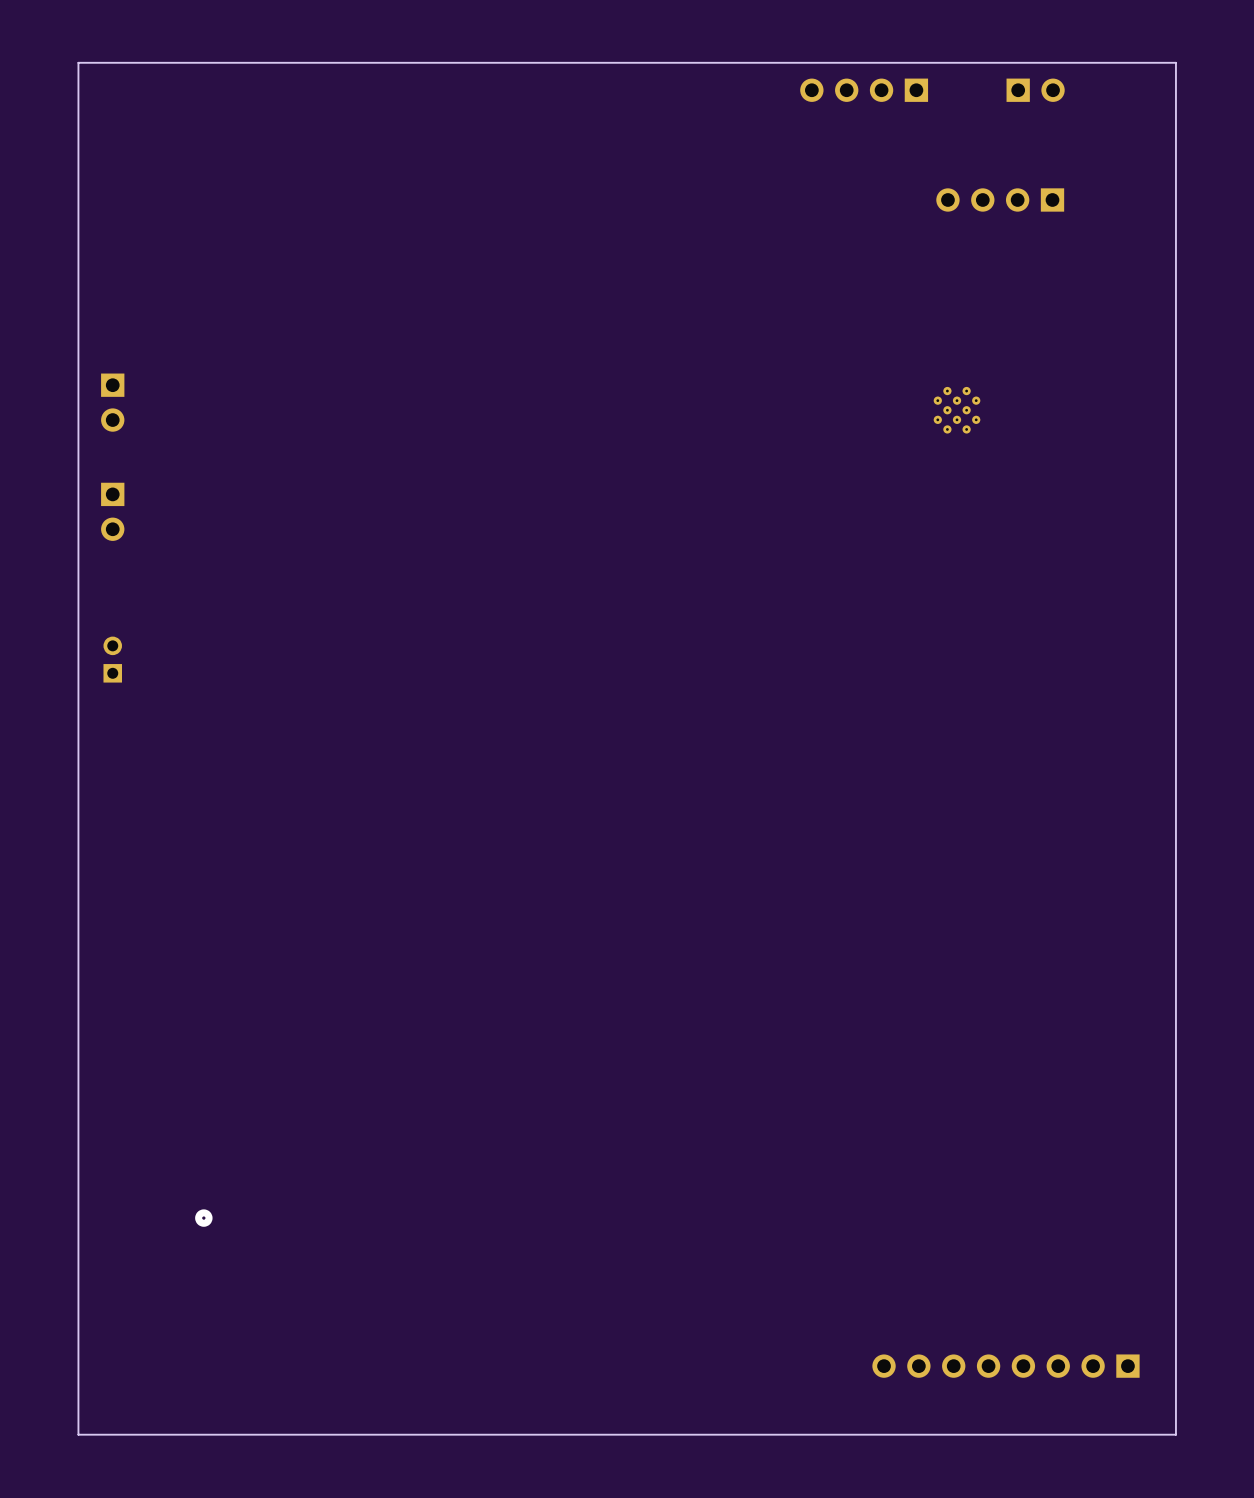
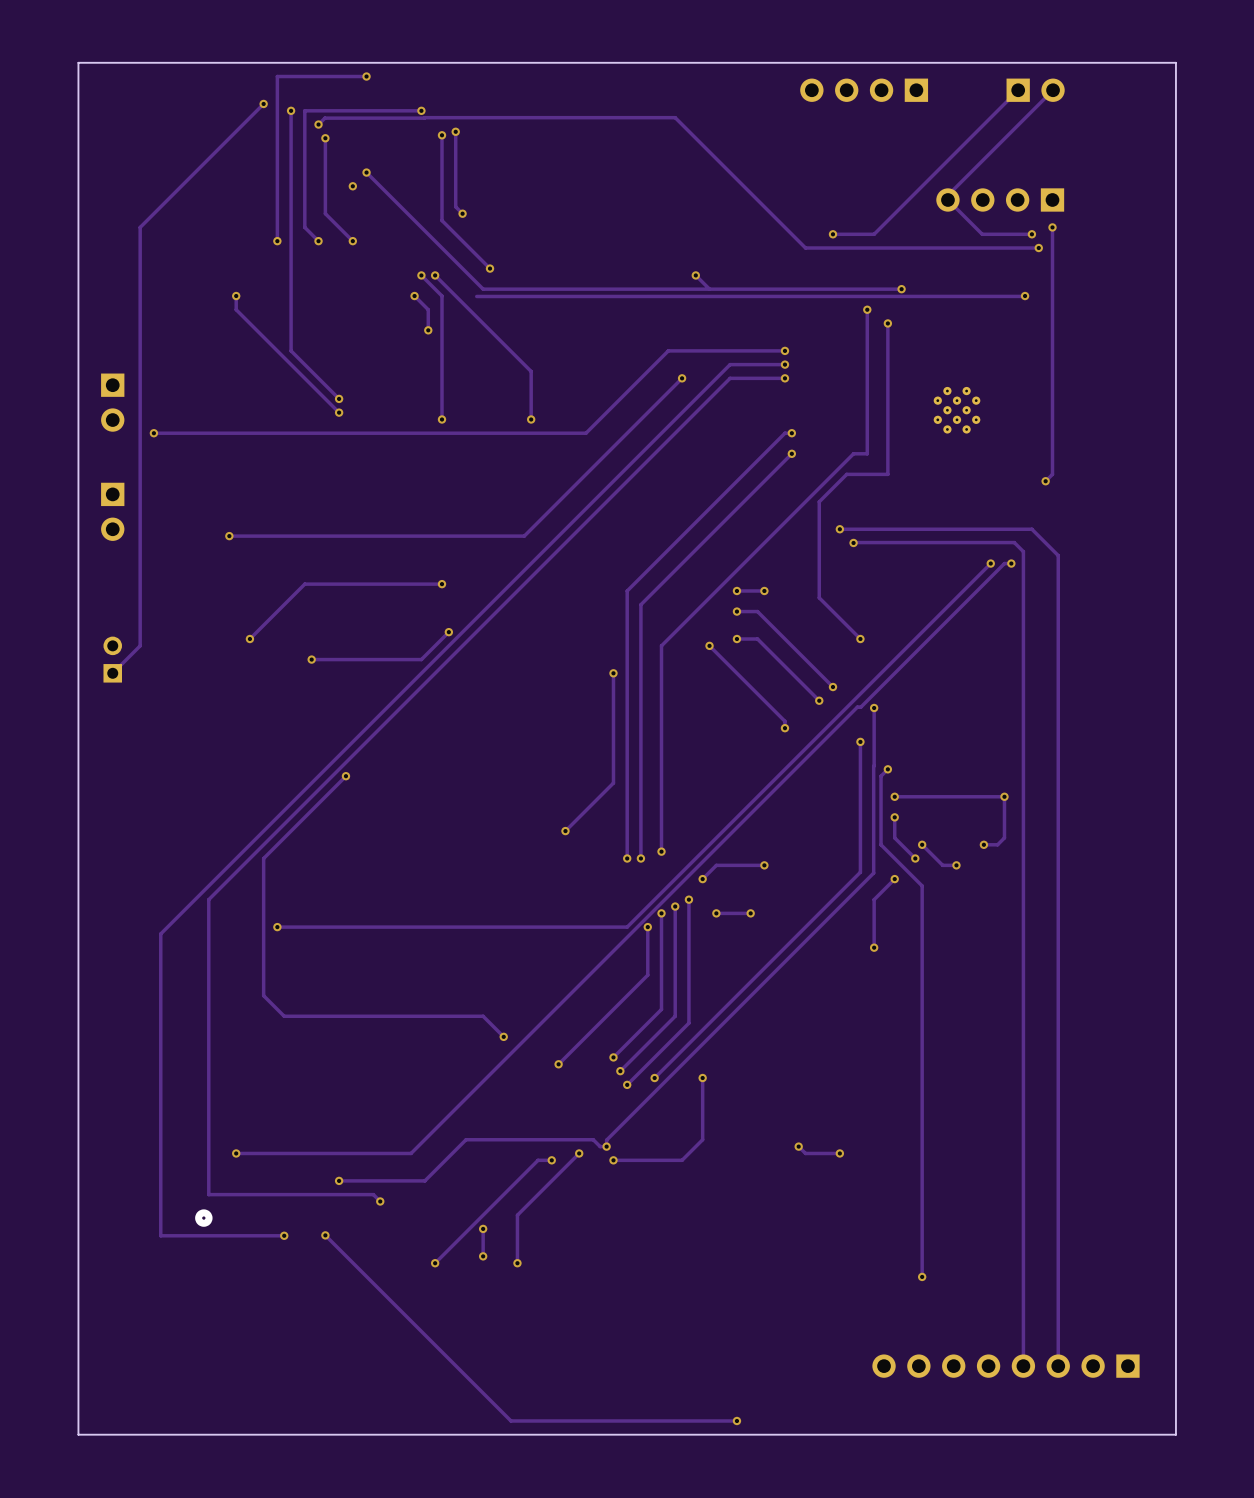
track: none -> (366, 76) (277, 76) (277, 241)
via: none -> (366, 76)
track: none -> (1018, 90) (874, 234) (832, 234)
track: none -> (1053, 94) (1053, 90) (947, 195) (947, 199) (982, 234) (1031, 234)
track: none -> (263, 103) (140, 227) (140, 645) (112, 673)
via: none -> (263, 103)
track: none -> (291, 110) (291, 350) (339, 398)
via: none -> (291, 110)
track: none -> (421, 110) (304, 110) (304, 227) (318, 241)
via: none -> (421, 110)
track: none -> (318, 124) (324, 118) (675, 117) (805, 248) (1038, 248)
via: none -> (318, 124)
track: none -> (455, 131) (455, 206) (462, 213)
via: none -> (455, 131)
track: none -> (442, 135) (442, 220) (490, 268)
via: none -> (442, 135)
track: none -> (325, 138) (325, 213) (352, 241)
via: none -> (325, 138)
track: none -> (366, 172) (483, 289) (901, 289)
via: none -> (366, 172)
via: none -> (352, 186)
via: none -> (462, 213)
track: none -> (1052, 227) (1052, 474) (1045, 481)
via: none -> (1052, 227)
via: none -> (832, 234)
via: none -> (1031, 234)
via: none -> (277, 241)
via: none -> (318, 241)
via: none -> (352, 241)
via: none -> (1038, 248)
via: none -> (490, 268)
track: none -> (421, 275) (442, 296) (442, 419)
via: none -> (421, 275)
track: none -> (435, 275) (531, 371) (531, 419)
via: none -> (435, 275)
track: none -> (695, 275) (709, 289)
via: none -> (695, 275)
via: none -> (901, 289)
track: none -> (236, 296) (236, 309) (339, 412)
via: none -> (236, 296)
track: none -> (414, 296) (428, 309) (428, 330)
via: none -> (414, 296)
track: none -> (1024, 296) (476, 296)
via: none -> (1025, 296)
track: none -> (867, 309) (867, 453) (853, 453) (661, 645) (661, 851)
via: none -> (867, 309)
track: none -> (887, 323) (887, 474) (846, 474) (819, 501) (819, 597) (860, 639)
via: none -> (887, 323)
via: none -> (428, 330)
track: none -> (784, 350) (668, 350) (586, 433) (153, 433)
via: none -> (784, 350)
track: none -> (784, 364) (730, 364) (160, 933) (160, 1235) (284, 1235)
via: none -> (784, 364)
track: none -> (682, 378) (524, 536) (229, 536)
via: none -> (682, 378)
track: none -> (784, 378) (730, 378) (208, 899) (208, 1194) (373, 1194) (380, 1201)
via: none -> (784, 378)
via: none -> (339, 398)
via: none -> (339, 412)
via: none -> (442, 419)
via: none -> (531, 419)
via: none -> (153, 433)
track: none -> (791, 433) (784, 433) (627, 590) (627, 858)
via: none -> (791, 433)
track: none -> (791, 453) (640, 604) (640, 858)
via: none -> (791, 453)
via: none -> (1045, 481)
track: none -> (839, 529) (1031, 529) (1058, 555) (1058, 1366)
via: none -> (839, 529)
via: none -> (229, 536)
track: none -> (853, 542) (1014, 542) (1023, 551) (1023, 1366)
via: none -> (853, 542)
track: none -> (990, 563) (627, 927) (277, 927)
via: none -> (990, 563)
track: none -> (1011, 563) (1004, 563) (860, 707) (857, 707) (411, 1153) (236, 1153)
via: none -> (1011, 563)
track: none -> (442, 584) (304, 584) (249, 639)
via: none -> (442, 584)
via: none -> (736, 590)
track: none -> (764, 590) (736, 590)
via: none -> (764, 590)
track: none -> (736, 611) (757, 611) (832, 687)
via: none -> (736, 611)
track: none -> (448, 632) (421, 659) (311, 659)
via: none -> (448, 632)
via: none -> (249, 639)
track: none -> (736, 639) (757, 639) (819, 700)
via: none -> (736, 639)
via: none -> (860, 639)
track: none -> (709, 645) (784, 721) (784, 728)
via: none -> (709, 645)
via: none -> (311, 659)
track: none -> (613, 673) (613, 783) (565, 831)
via: none -> (613, 673)
via: none -> (832, 687)
via: none -> (819, 700)
track: none -> (874, 707) (873, 873) (606, 1140) (606, 1146) (600, 1146) (593, 1139) (466, 1139) (424, 1180) (339, 1180)
via: none -> (874, 707)
via: none -> (784, 728)
track: none -> (860, 741) (860, 872) (654, 1078)
via: none -> (860, 741)
track: none -> (887, 769) (881, 776) (881, 844) (922, 885) (922, 1276)
via: none -> (887, 769)
track: none -> (345, 776) (263, 858) (263, 995) (284, 1016) (483, 1016) (503, 1036)
via: none -> (345, 776)
track: none -> (894, 796) (1004, 796) (1004, 837) (997, 844) (983, 844)
via: none -> (894, 796)
via: none -> (1004, 796)
track: none -> (894, 817) (894, 837) (915, 858)
via: none -> (894, 817)
via: none -> (565, 831)
track: none -> (922, 844) (942, 865) (956, 865)
via: none -> (922, 844)
via: none -> (983, 844)
via: none -> (661, 851)
via: none -> (627, 858)
via: none -> (640, 858)
via: none -> (915, 858)
track: none -> (764, 865) (716, 865) (702, 879)
via: none -> (764, 865)
via: none -> (956, 865)
via: none -> (702, 879)
track: none -> (894, 879) (874, 899) (874, 947)
via: none -> (894, 879)
track: none -> (688, 899) (688, 1023) (627, 1084)
via: none -> (688, 899)
track: none -> (675, 906) (675, 1016) (620, 1071)
via: none -> (675, 906)
track: none -> (661, 913) (661, 1009) (613, 1057)
via: none -> (661, 913)
via: none -> (716, 913)
track: none -> (750, 913) (716, 913)
via: none -> (750, 913)
via: none -> (277, 927)
track: none -> (647, 927) (647, 975) (558, 1064)
via: none -> (647, 927)
via: none -> (874, 947)
via: none -> (503, 1036)
via: none -> (613, 1057)
via: none -> (558, 1064)
via: none -> (620, 1071)
via: none -> (654, 1078)
track: none -> (702, 1078) (702, 1139) (682, 1160) (613, 1160)
via: none -> (702, 1078)
via: none -> (627, 1084)
via: none -> (606, 1146)
track: none -> (798, 1146) (805, 1153) (839, 1153)
via: none -> (798, 1146)
via: none -> (236, 1153)
track: none -> (579, 1153) (517, 1215) (517, 1263)
via: none -> (579, 1153)
via: none -> (839, 1153)
track: none -> (551, 1160) (538, 1160) (435, 1263)
via: none -> (551, 1160)
via: none -> (613, 1160)
via: none -> (339, 1180)
via: none -> (380, 1201)
track: none -> (483, 1228) (483, 1256)
via: none -> (483, 1228)
via: none -> (284, 1235)
track: none -> (325, 1235) (510, 1420) (736, 1420)
via: none -> (325, 1235)
via: none -> (483, 1256)
via: none -> (435, 1263)
via: none -> (517, 1263)
via: none -> (922, 1276)
via: none -> (736, 1420)

